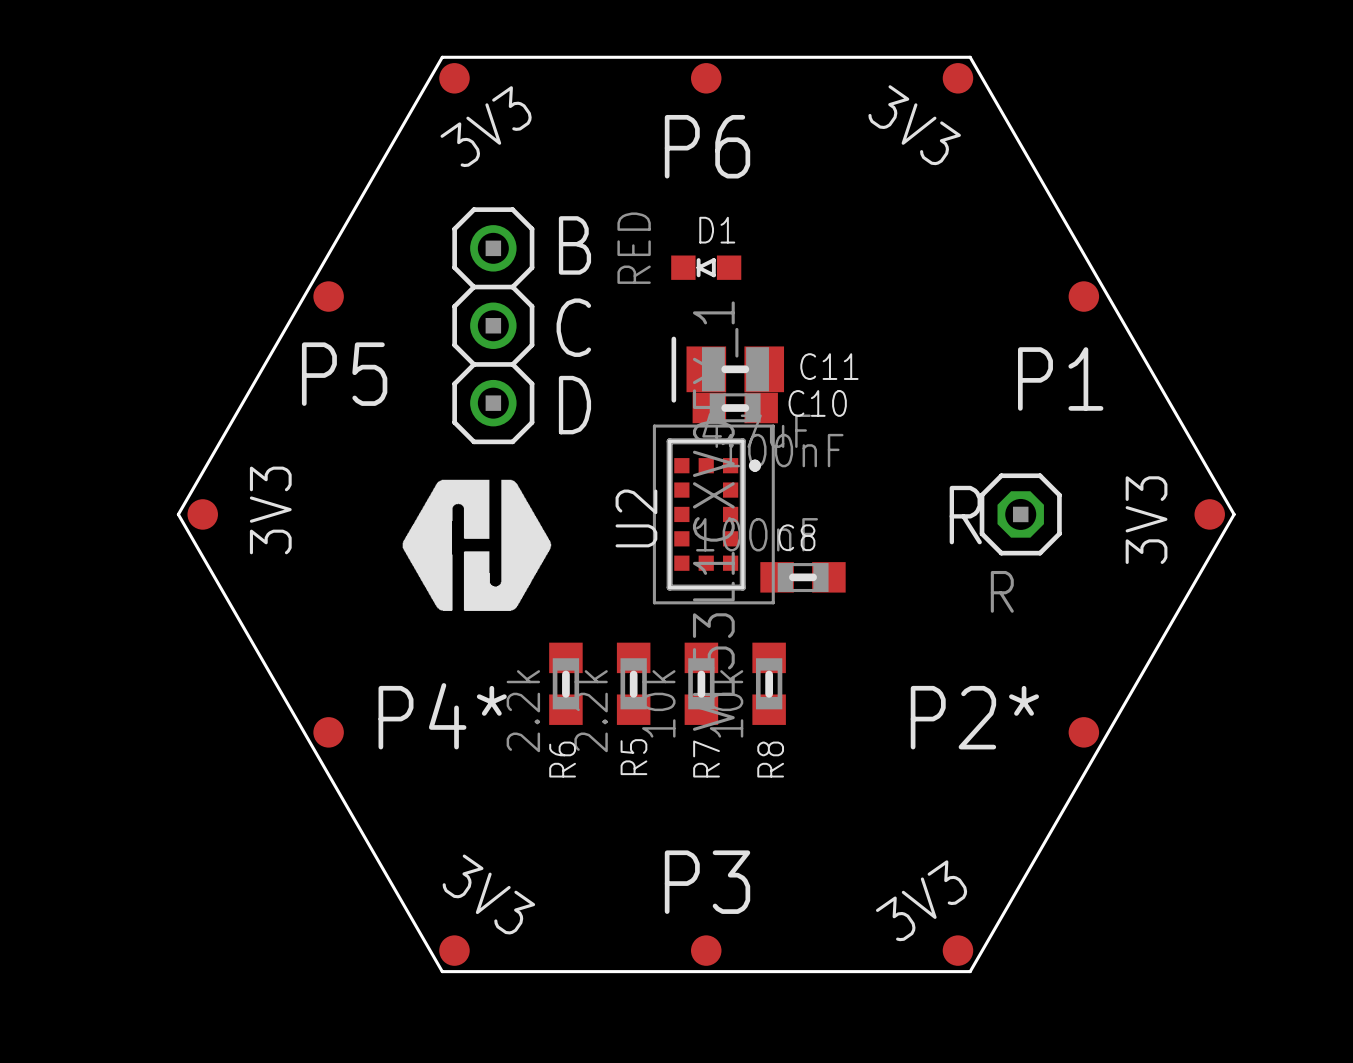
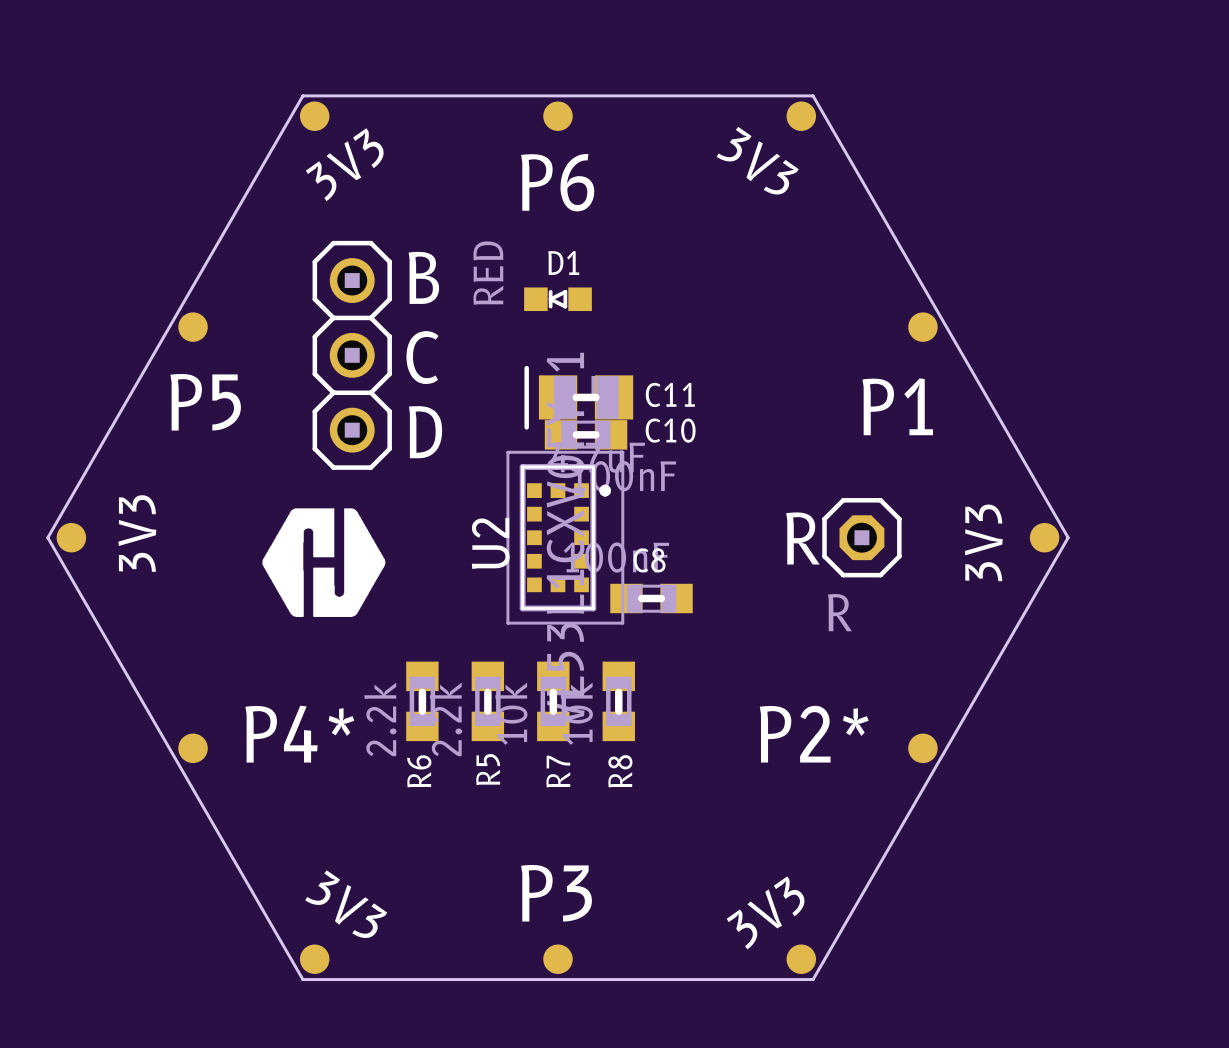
drawing shape: [402, 479, 552, 611] -> [262, 508, 386, 617]

